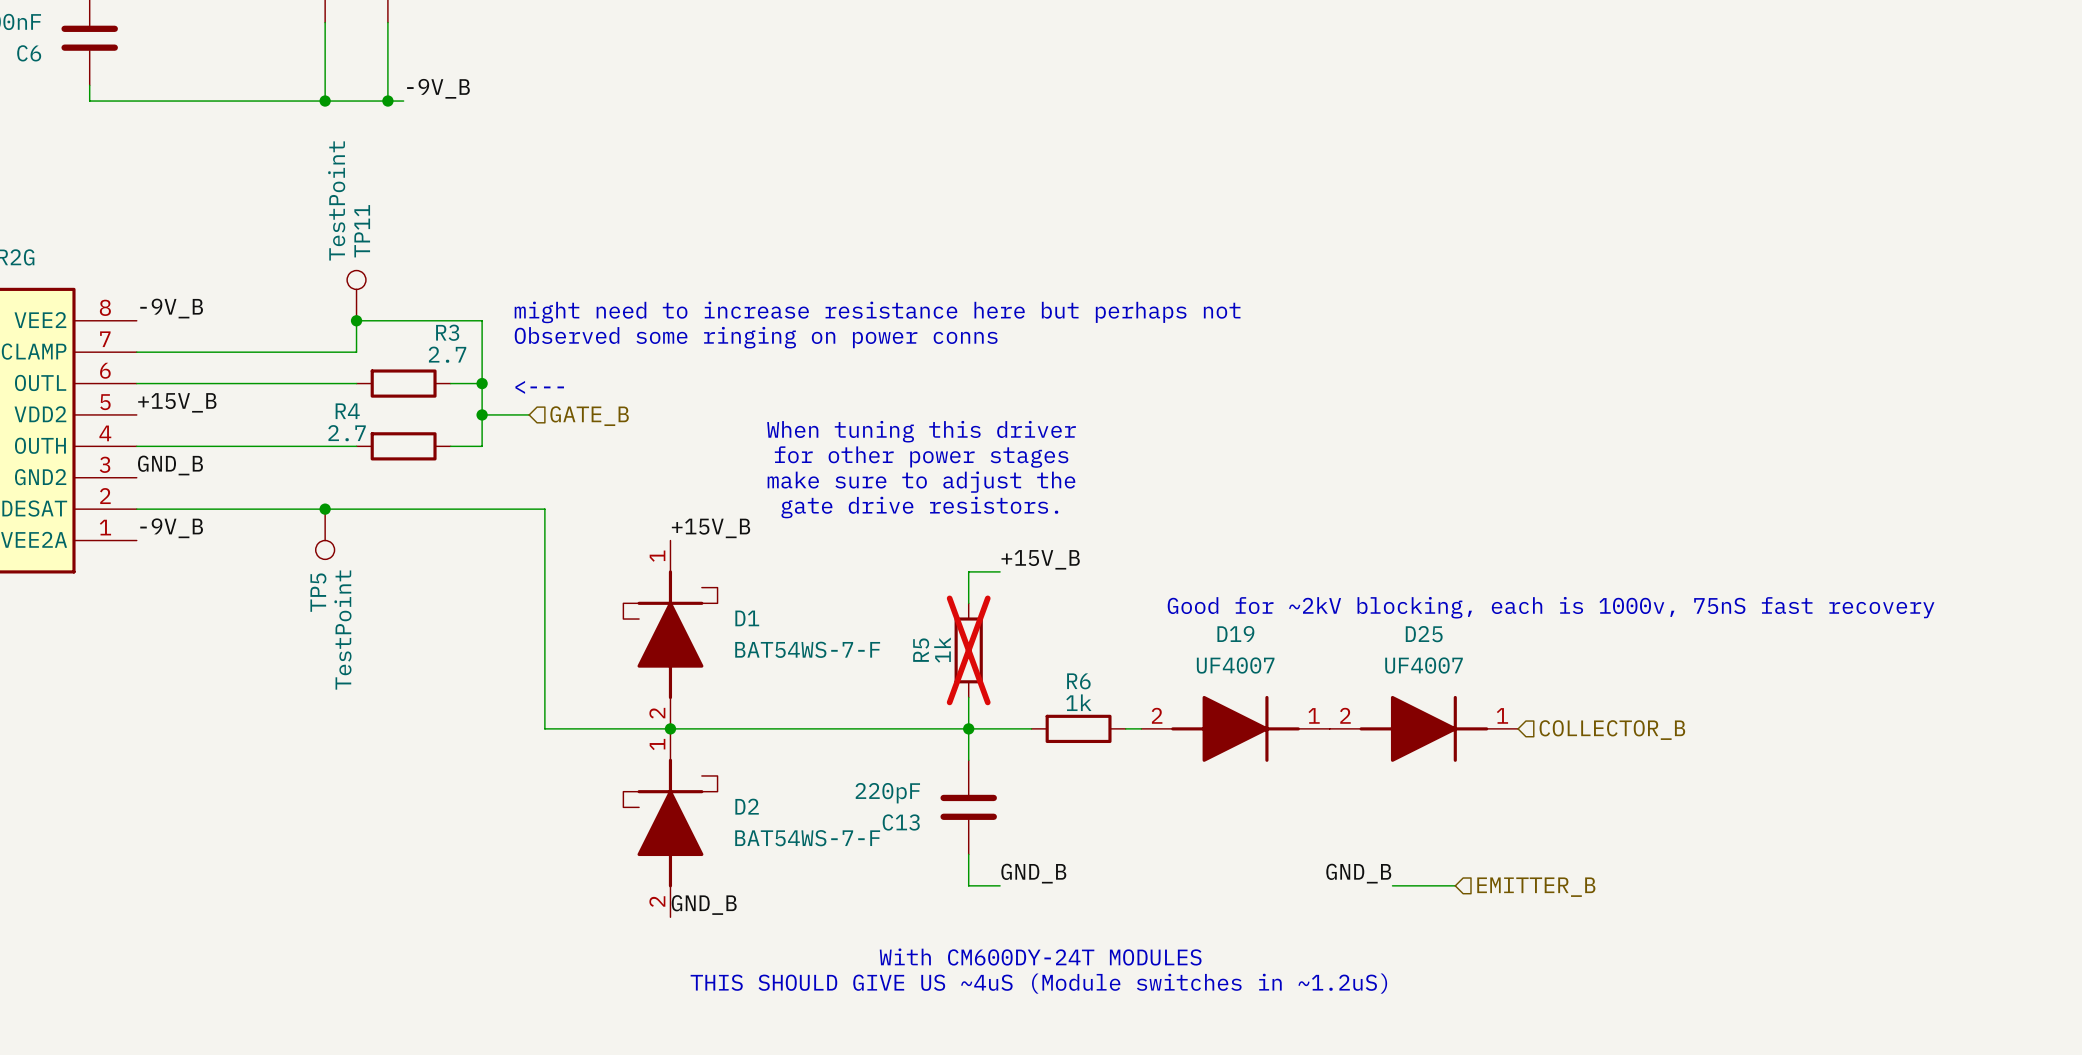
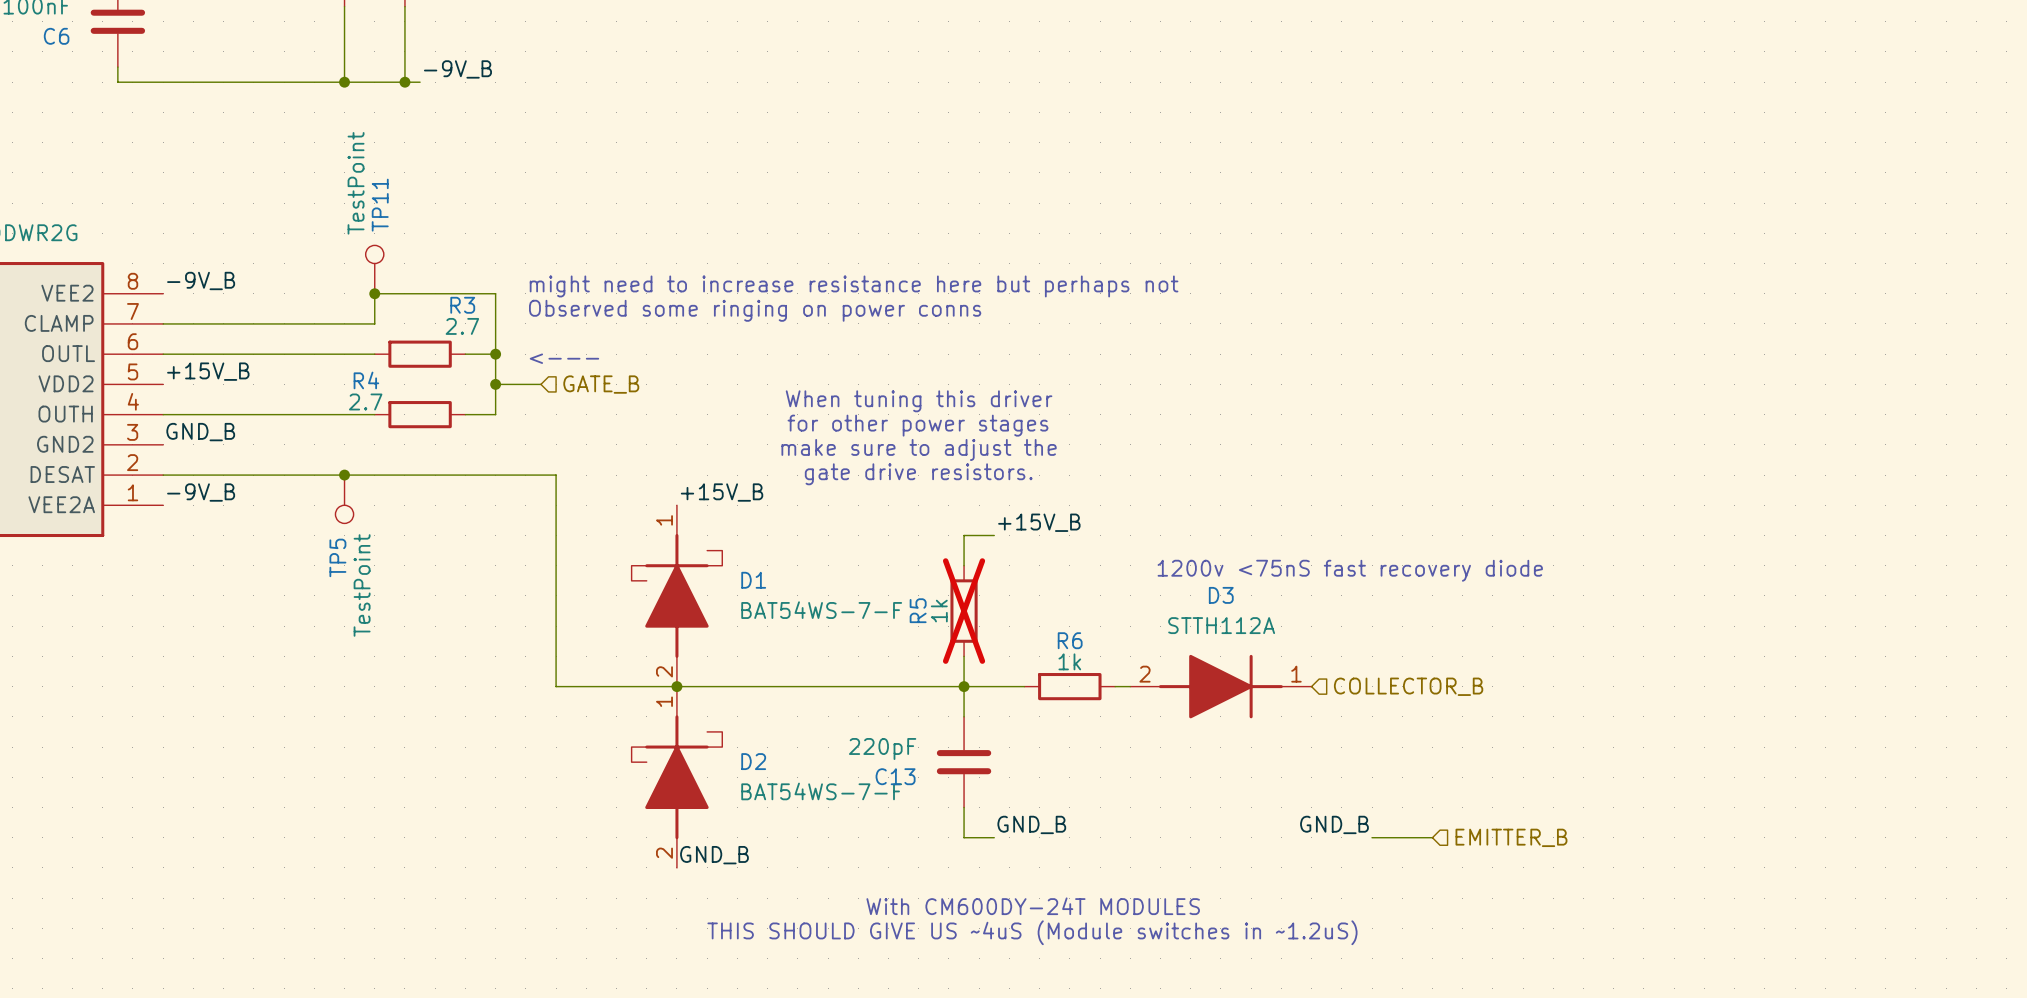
text: Good for ~2kV blocking, each is 1000v, 75nS fast recovery (1551, 607) -> 1200v <75nS fast recovery diode (1350, 570)
D19 name: D19 (1235, 633) -> D3 (1221, 595)
D19 value: UF4007 (1235, 665) -> STTH112A (1221, 625)
D25: UF4007 (1423, 728) -> none
hierarchical label position: COLLECTOR_B (1612, 730) -> COLLECTOR_B (1408, 686)

